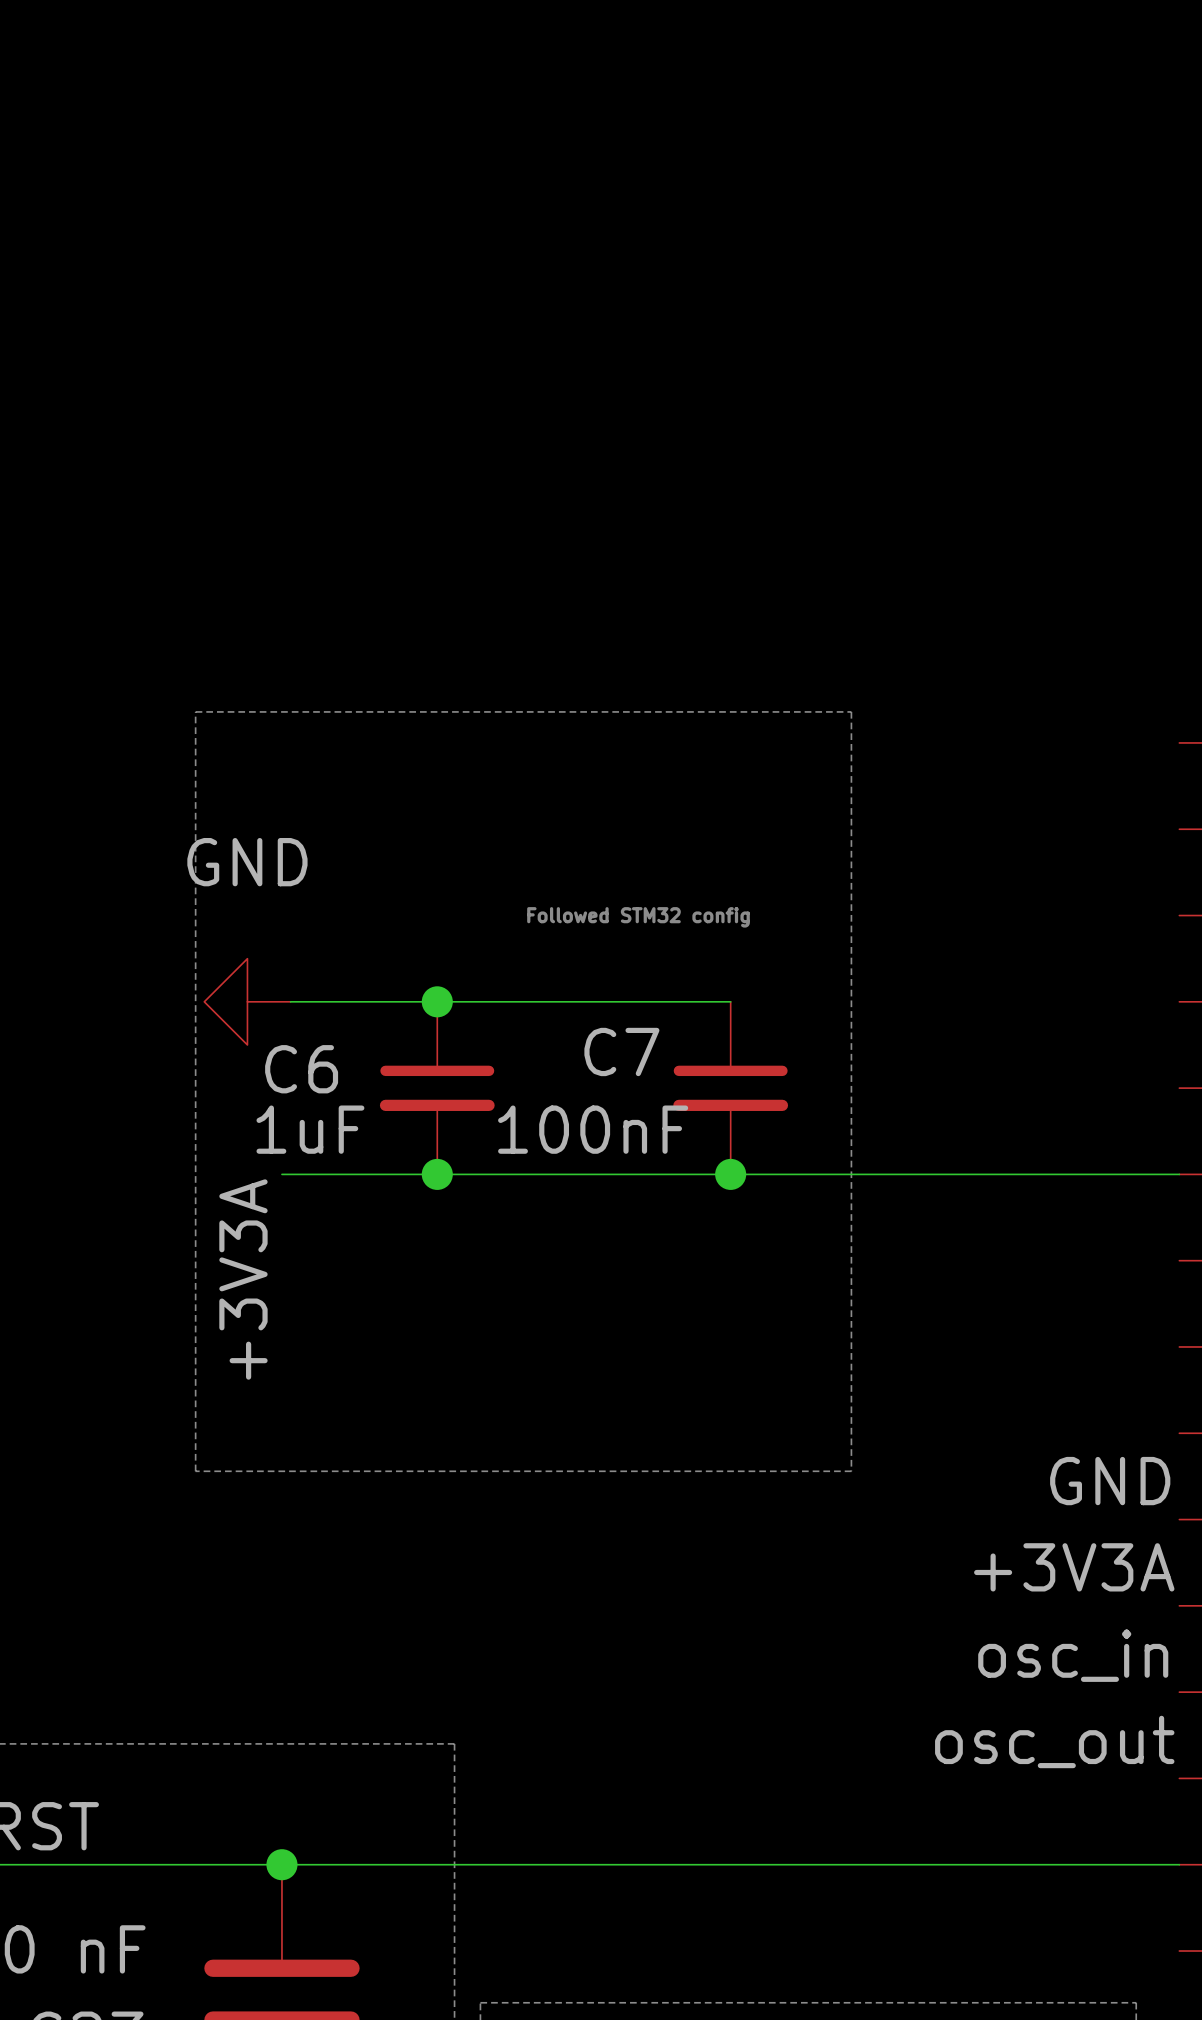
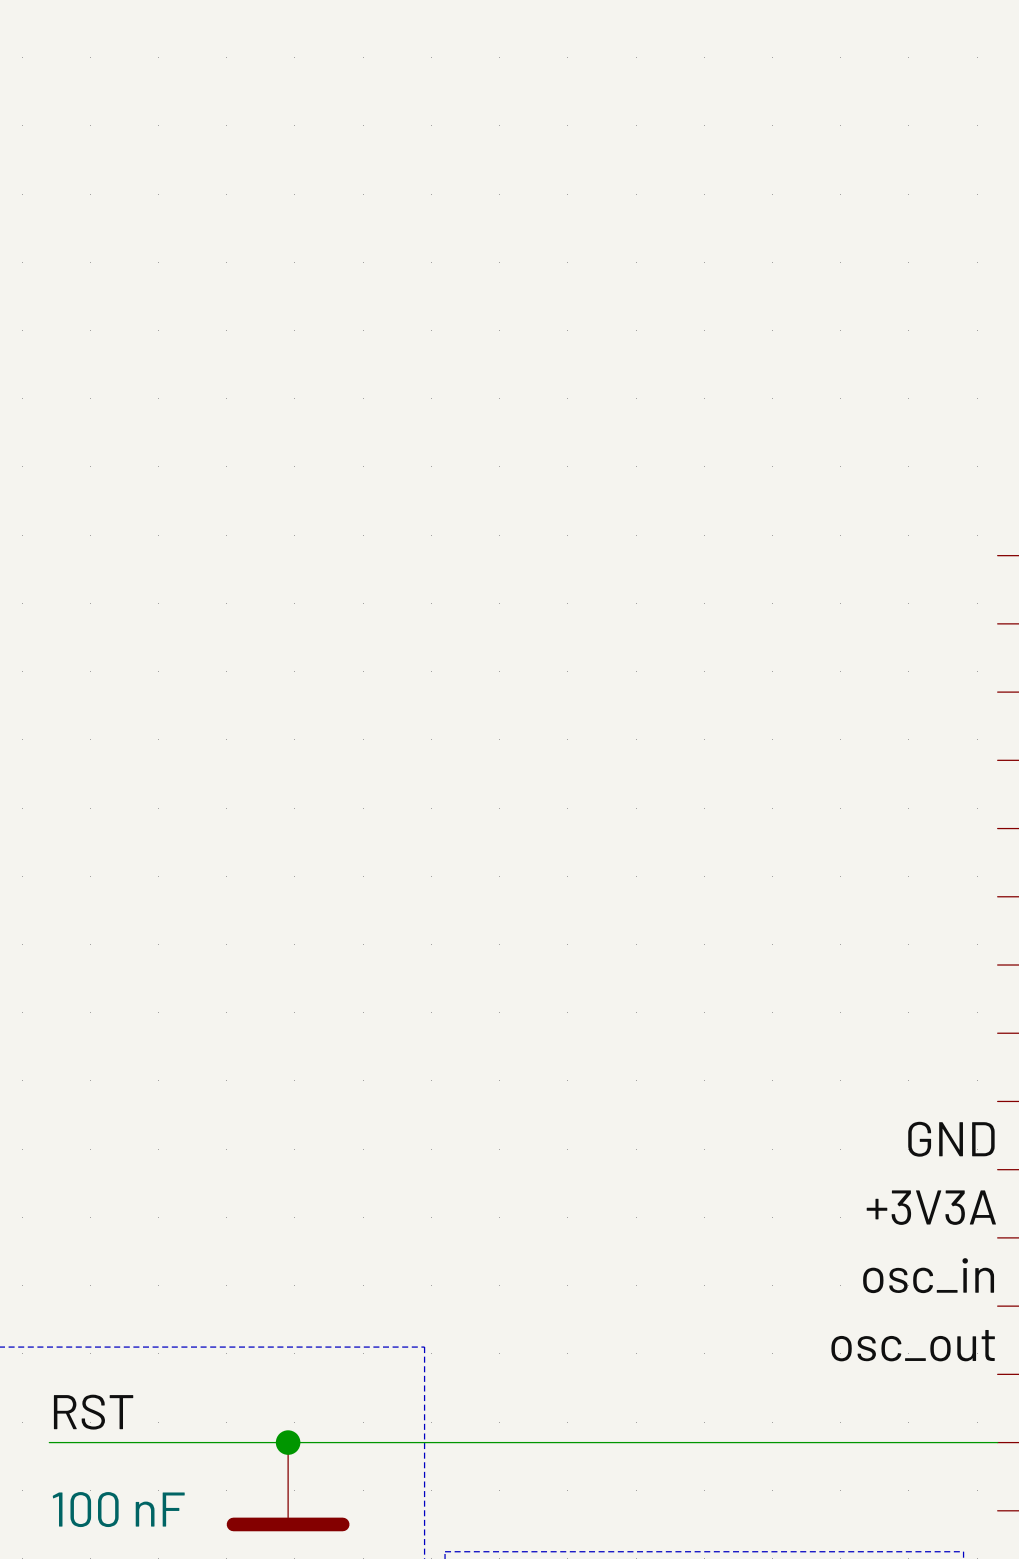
line: (195, 711) (851, 711) (851, 1471) (195, 1471) (195, 711) -> none
text: Followed STM32 config (638, 917) -> none
power symbol: GND (247, 1001) -> none
wire: (290, 1001) (730, 1001) -> none
junction: (437, 1001) -> none
C6: 1uF (437, 1088) -> none
C7: 100nF (730, 1088) -> none
wire: (281, 1174) (1179, 1174) -> none
junction: (437, 1174) -> none
junction: (730, 1174) -> none
label: +3V3A (243, 1279) -> none

